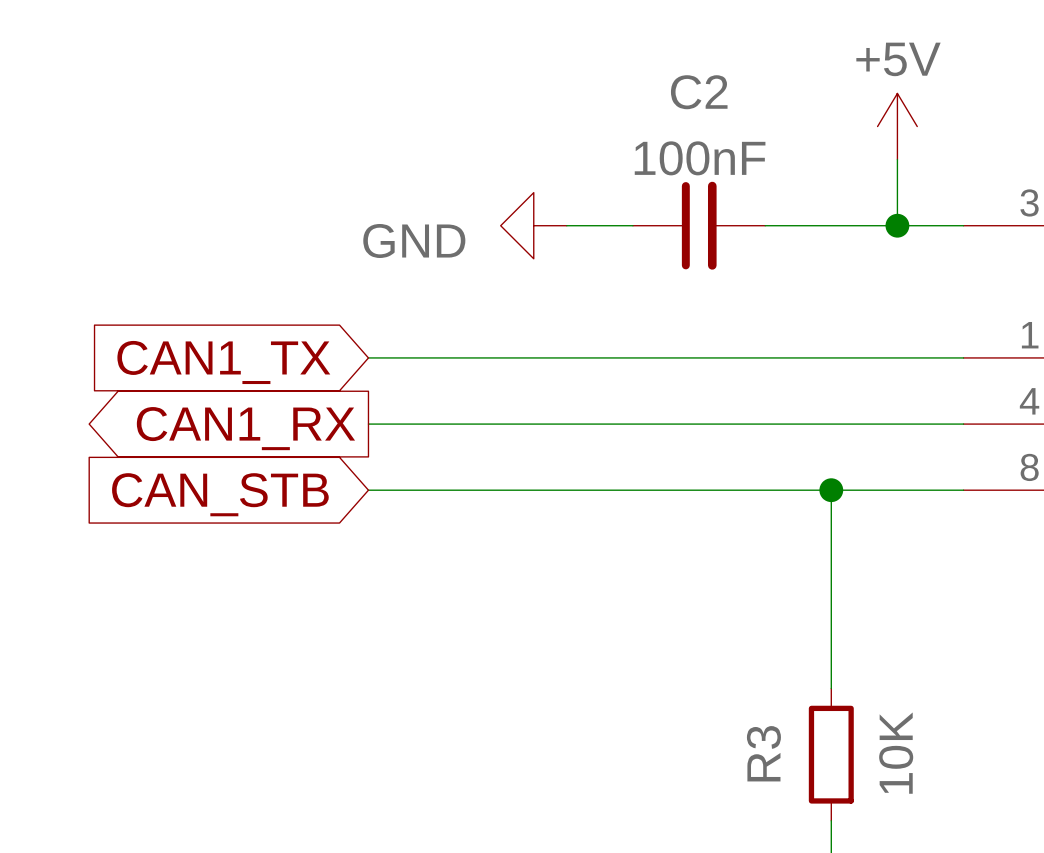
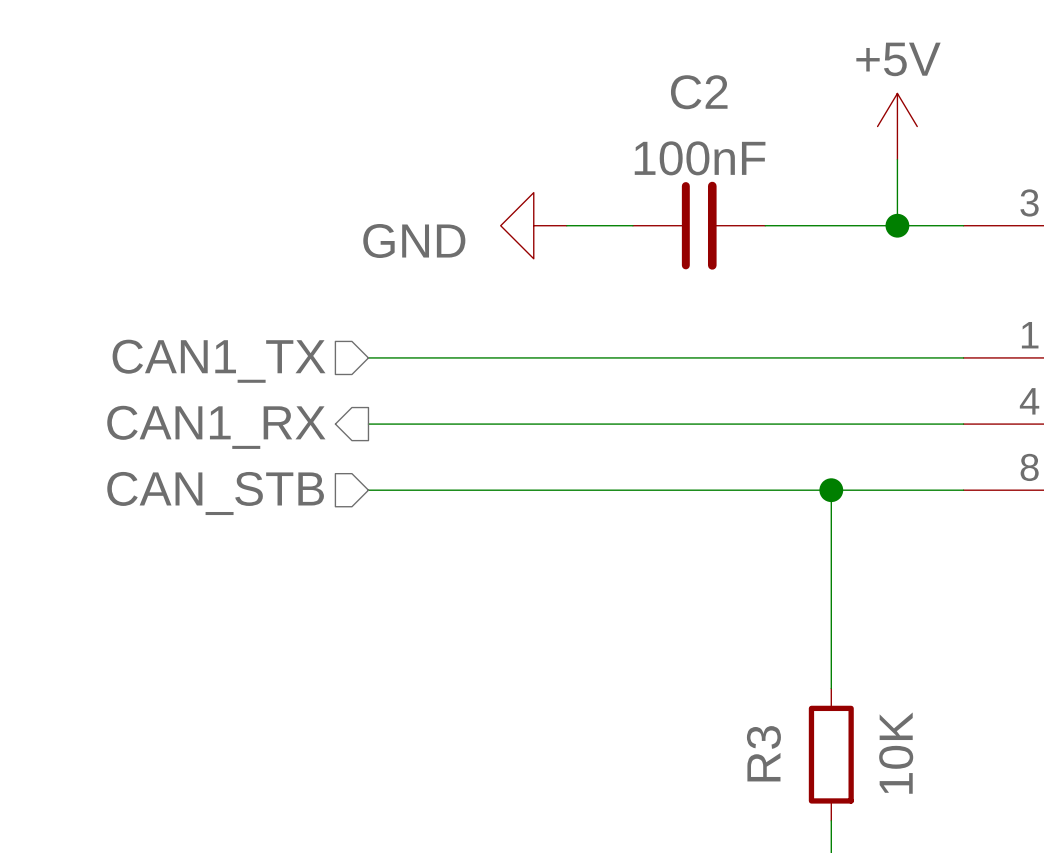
hierarchical label: none -> CAN1_TX (219, 361)
global label: CAN1_TX (223, 362) -> none
hierarchical label: none -> CAN1_RX (216, 427)
global label: CAN1_RX (245, 428) -> none
hierarchical label: none -> CAN_STB (215, 493)
global label: CAN_STB (220, 494) -> none

